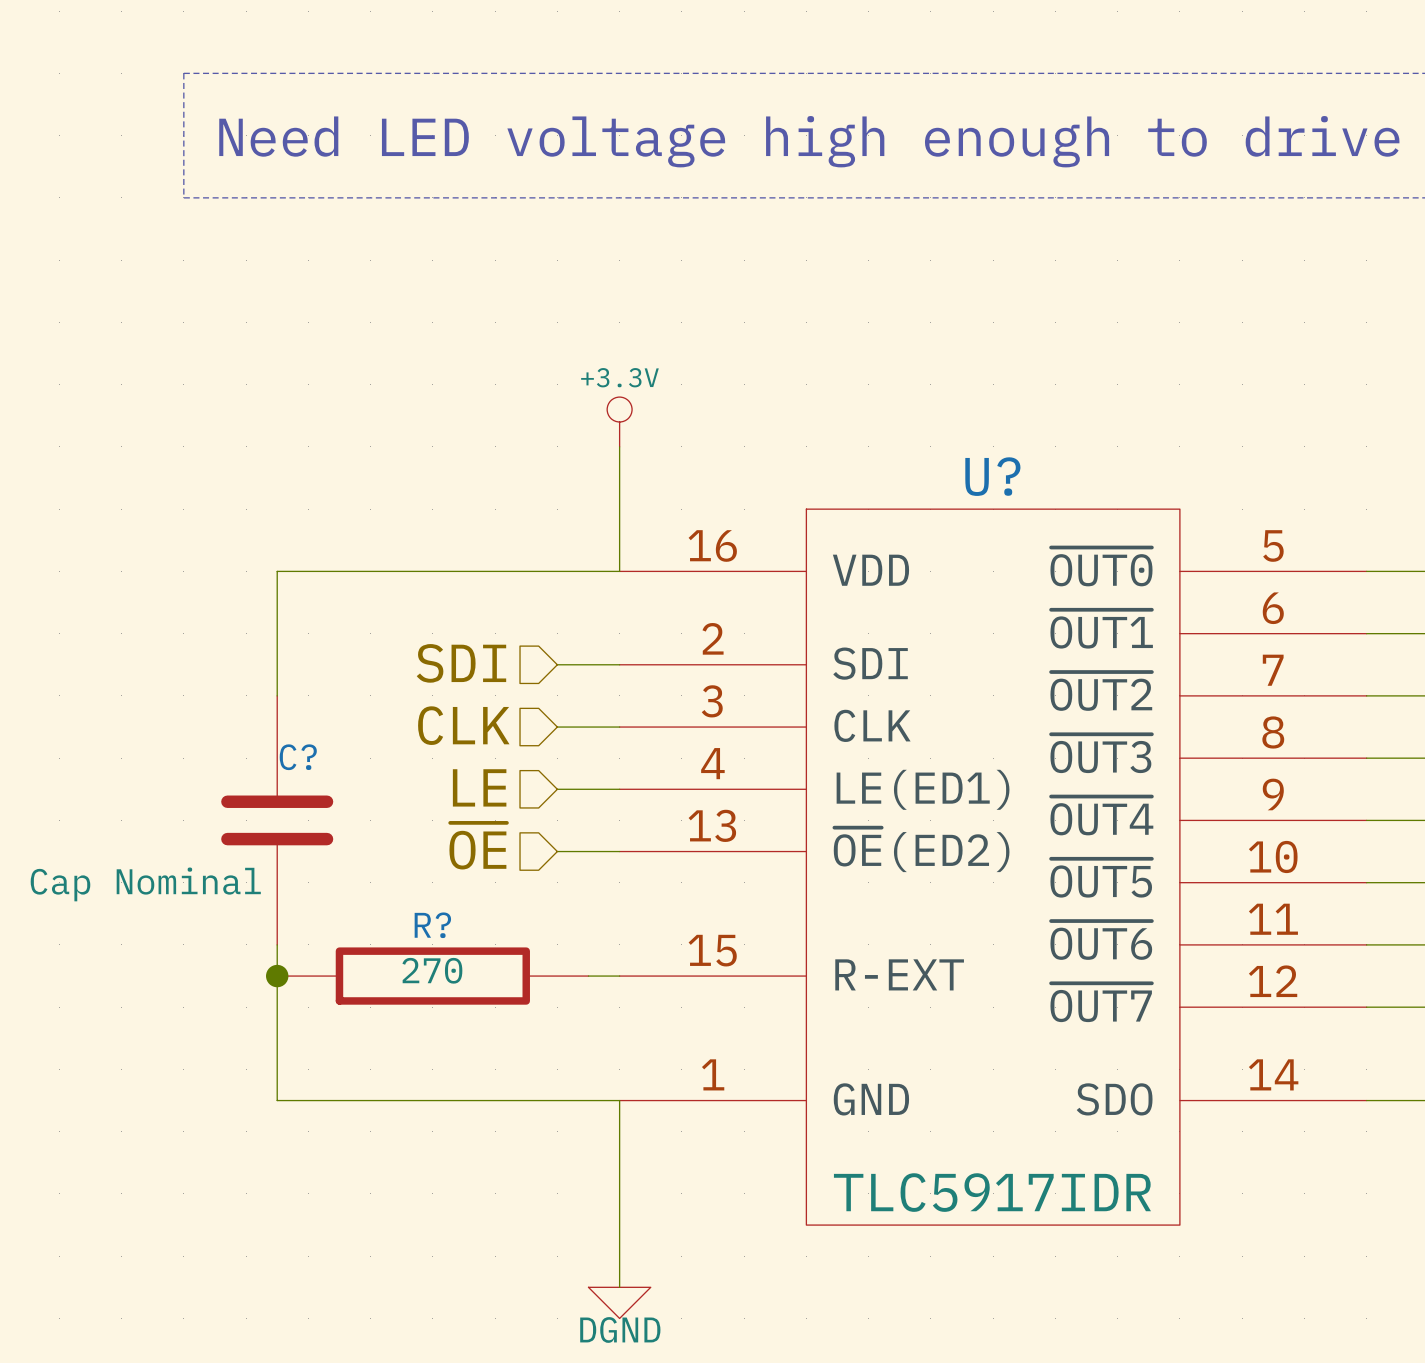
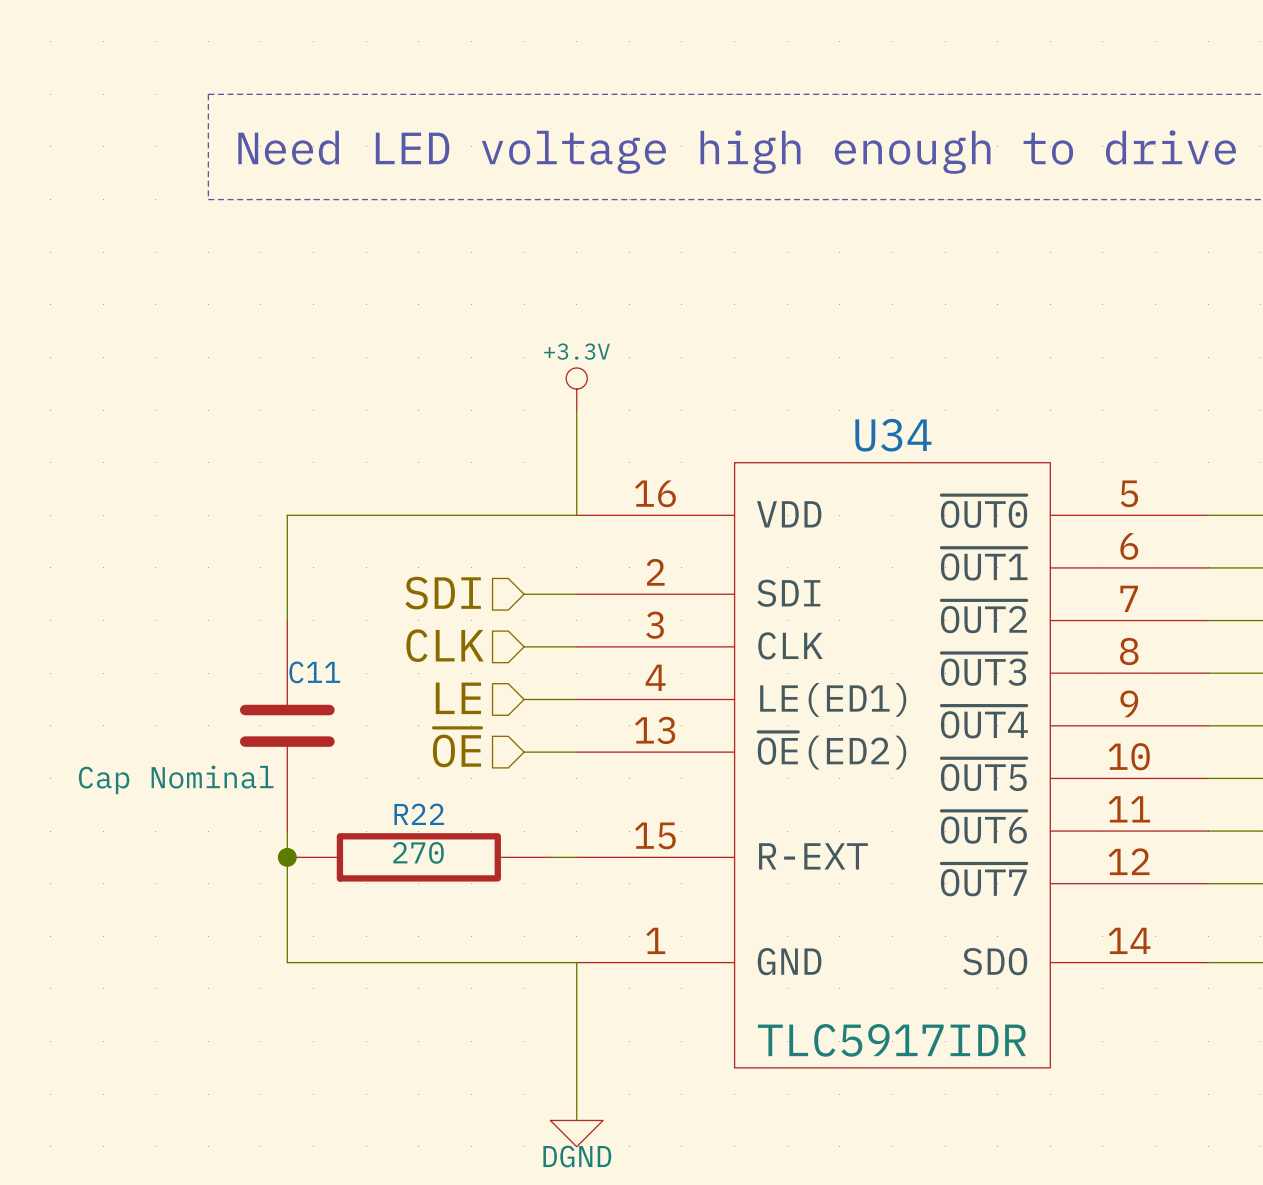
U? name: U? (992, 476) -> U34 (893, 435)
C? name: C? (298, 757) -> C11 (314, 672)
R? name: R? (432, 925) -> R22 (419, 814)

